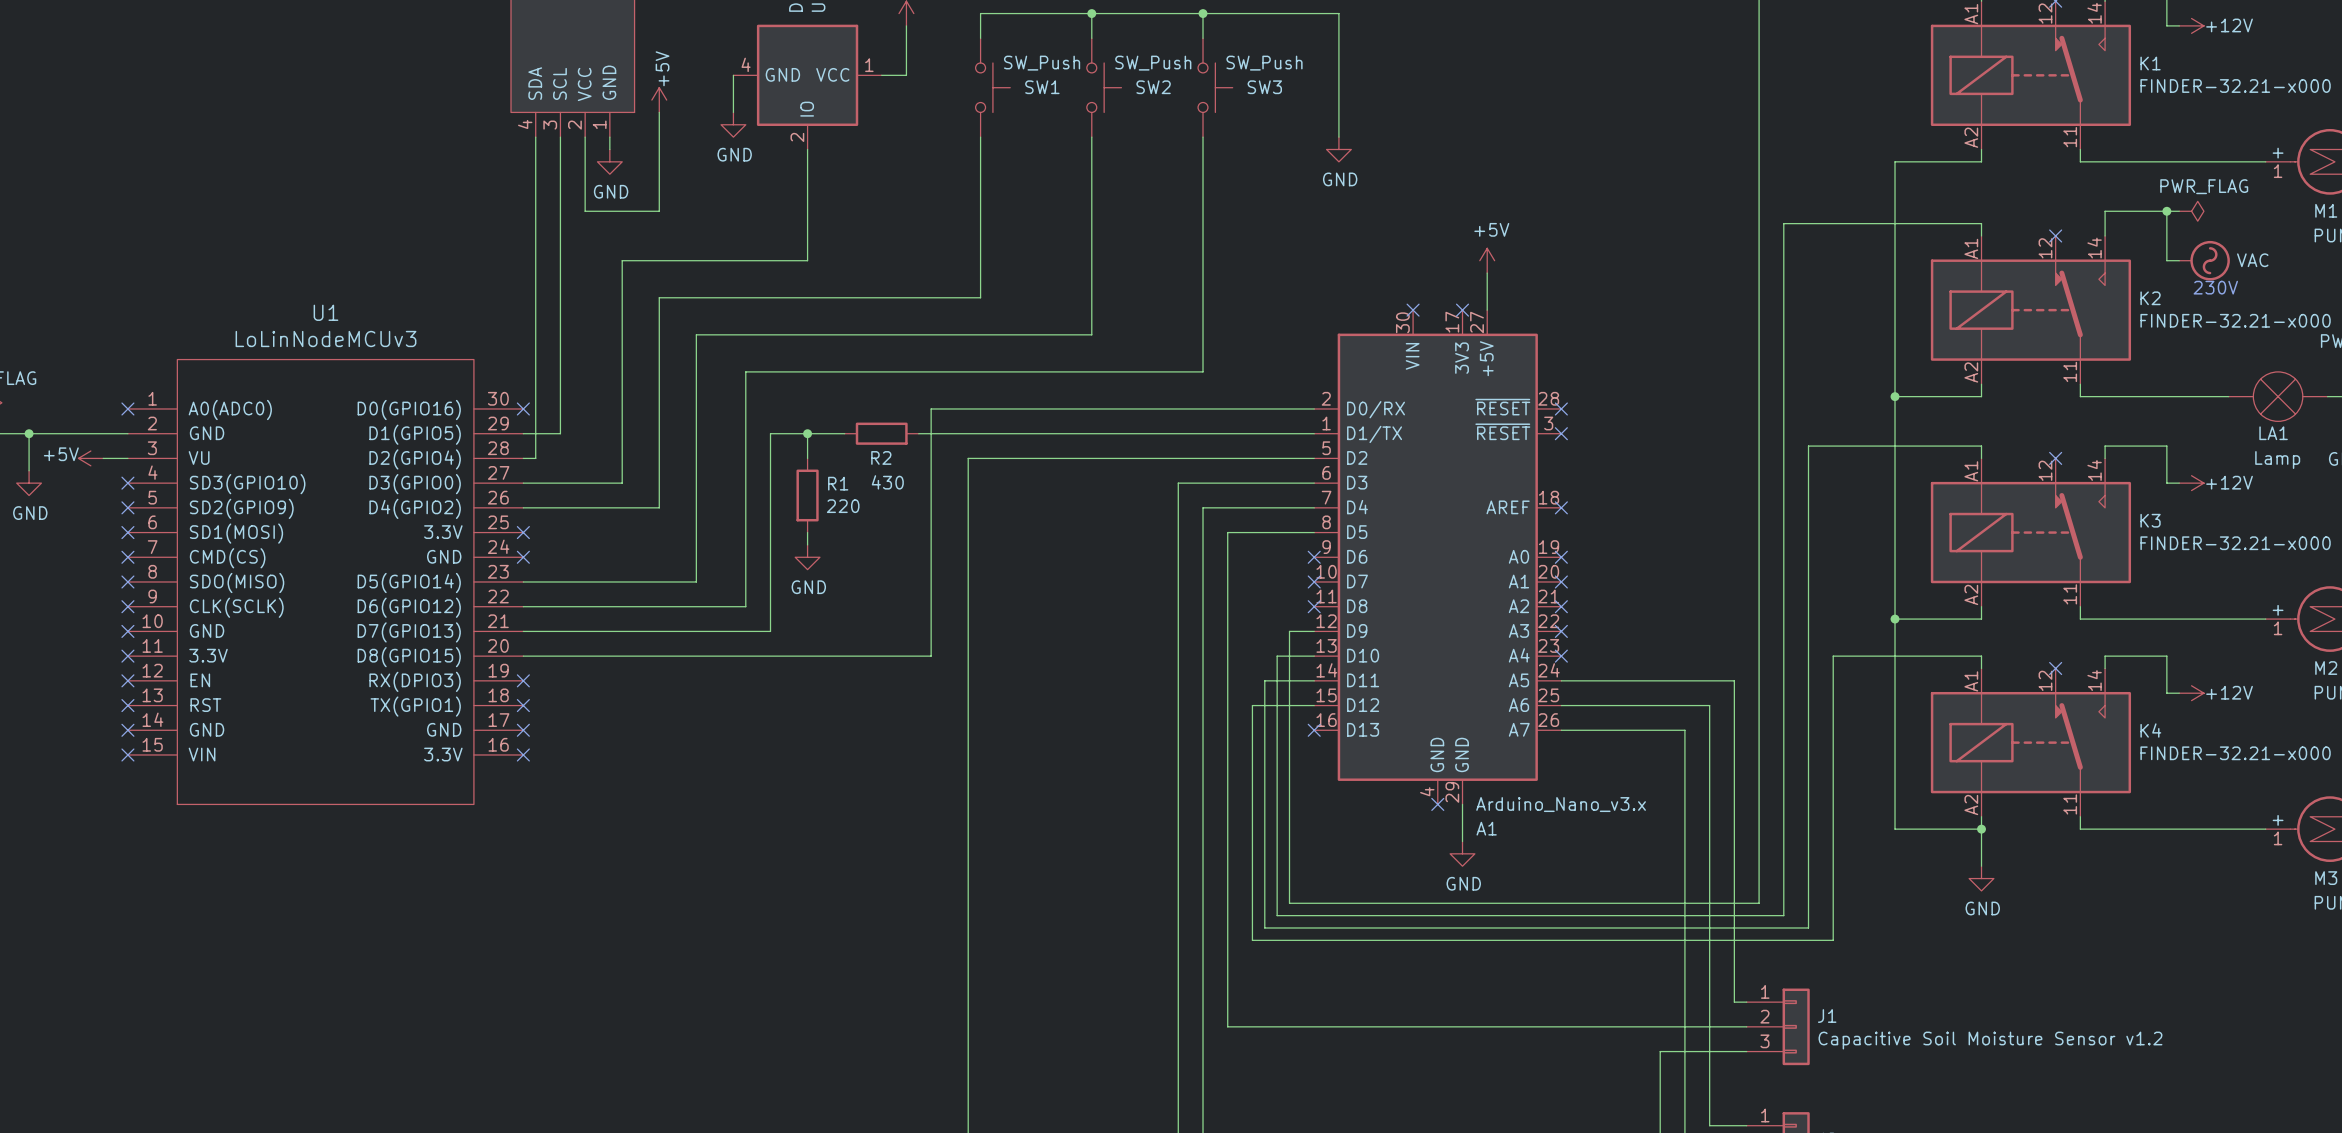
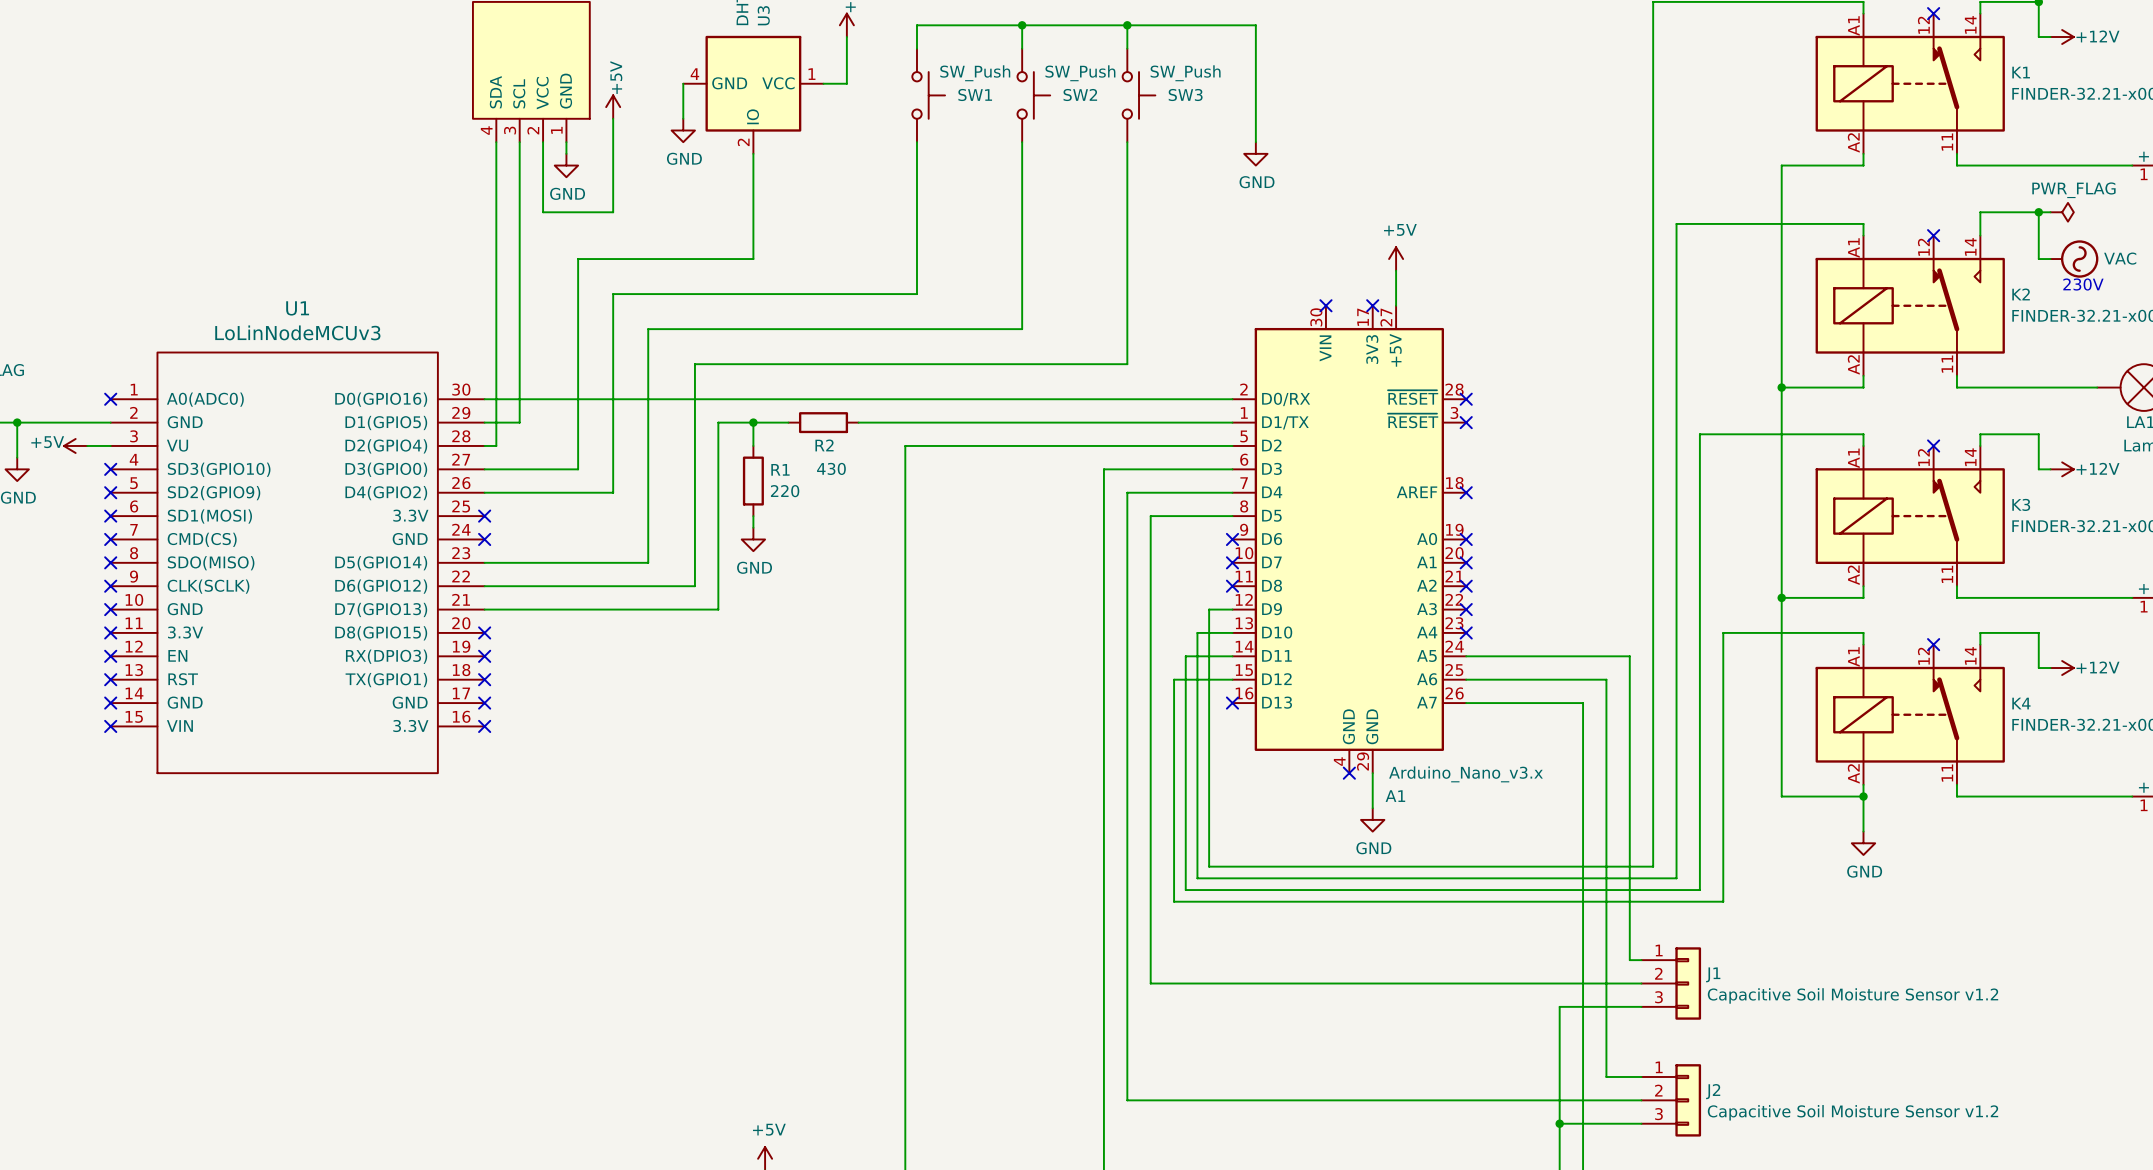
no-connect mark: (523, 408) -> none
wire: (931, 408) (931, 656) (523, 656) -> (870, 399) (484, 399)
no-connect mark: none -> (484, 632)

